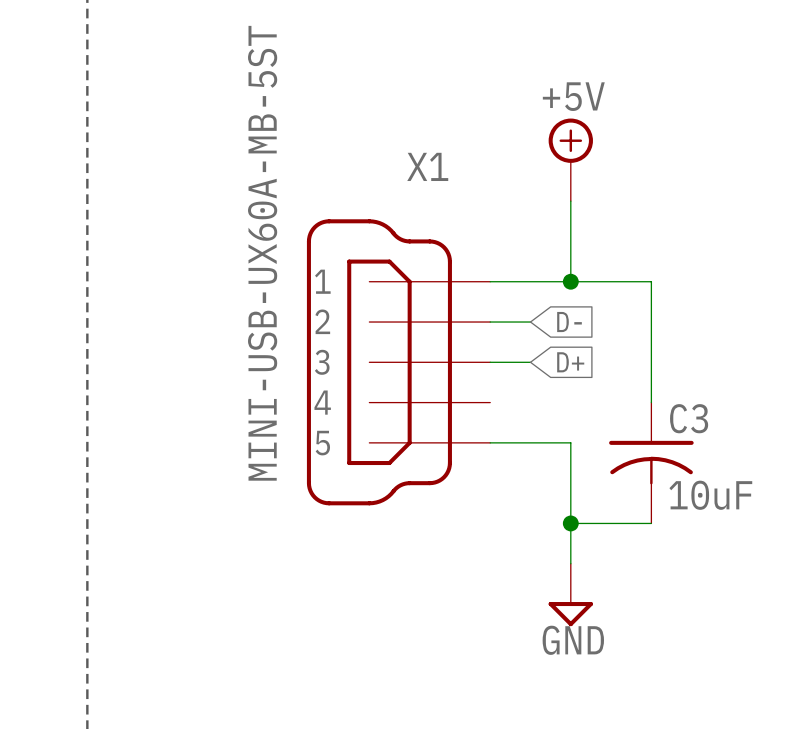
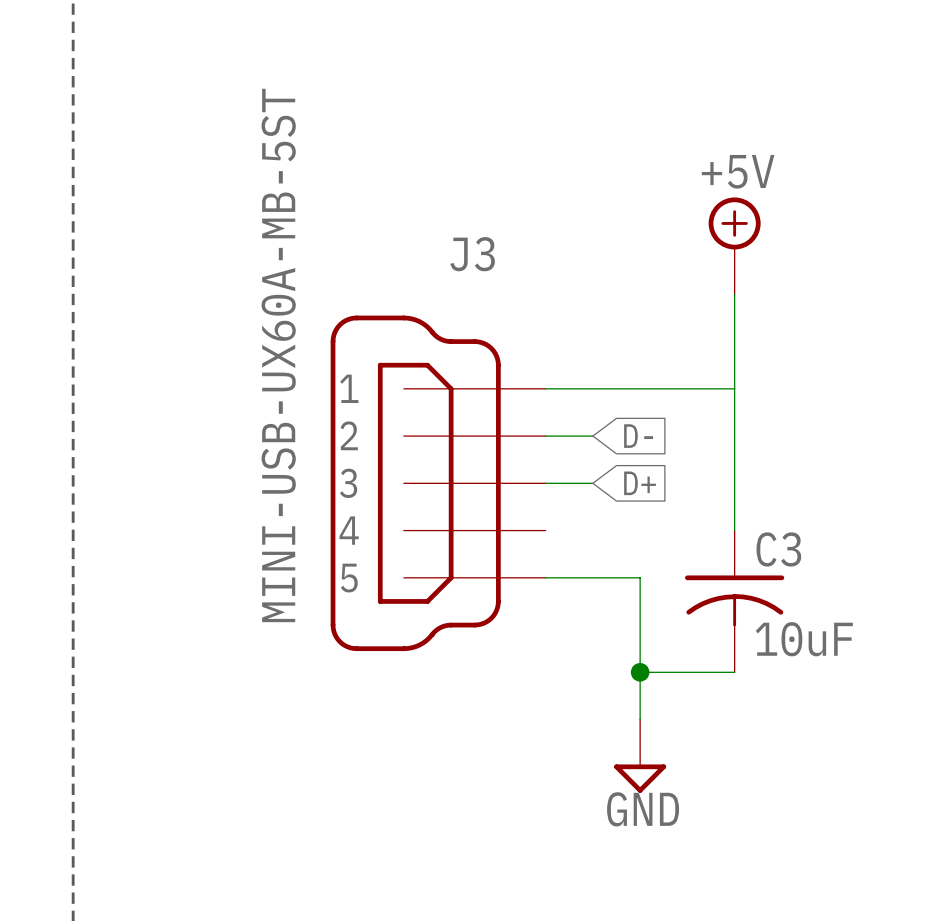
power symbol position: +5V (570, 159) -> +5V (734, 245)
X1 name: X1 (427, 166) -> J3 (472, 254)
wire: (570, 201) (570, 281) -> (734, 294) (734, 388)
junction: (570, 281) -> none

